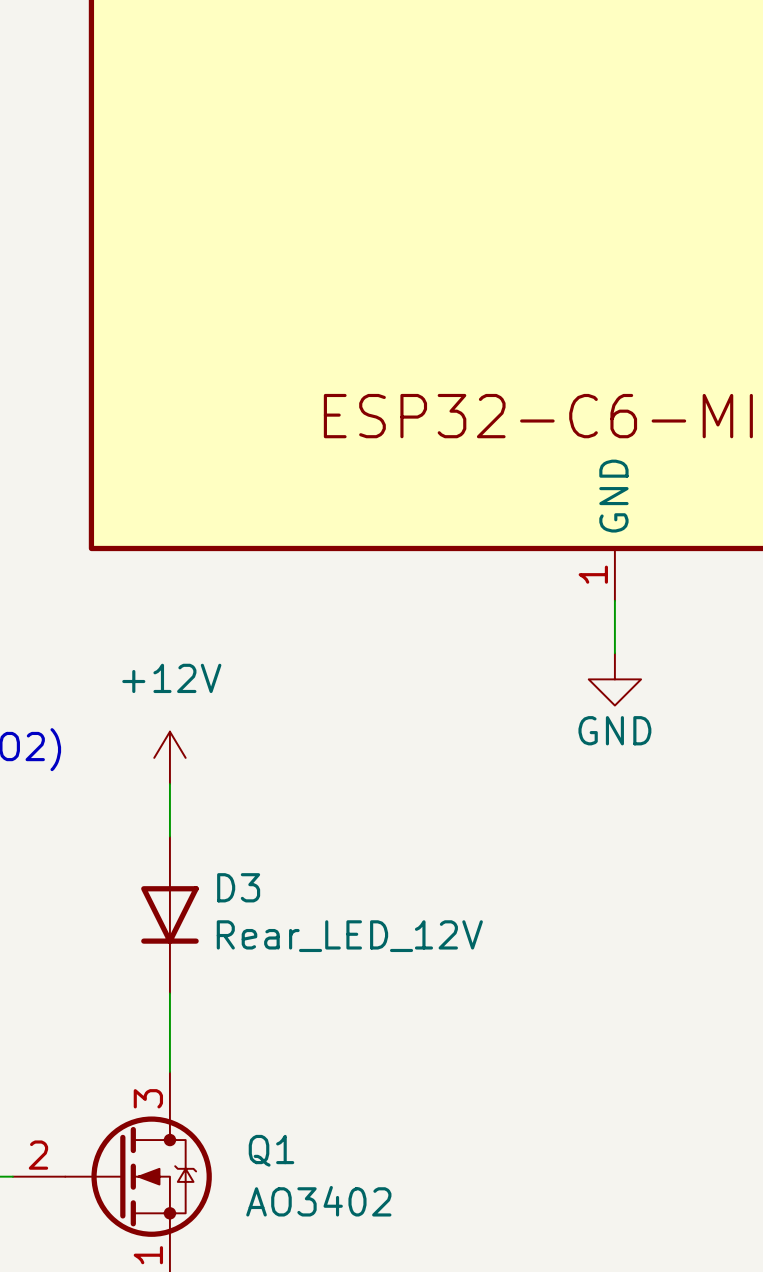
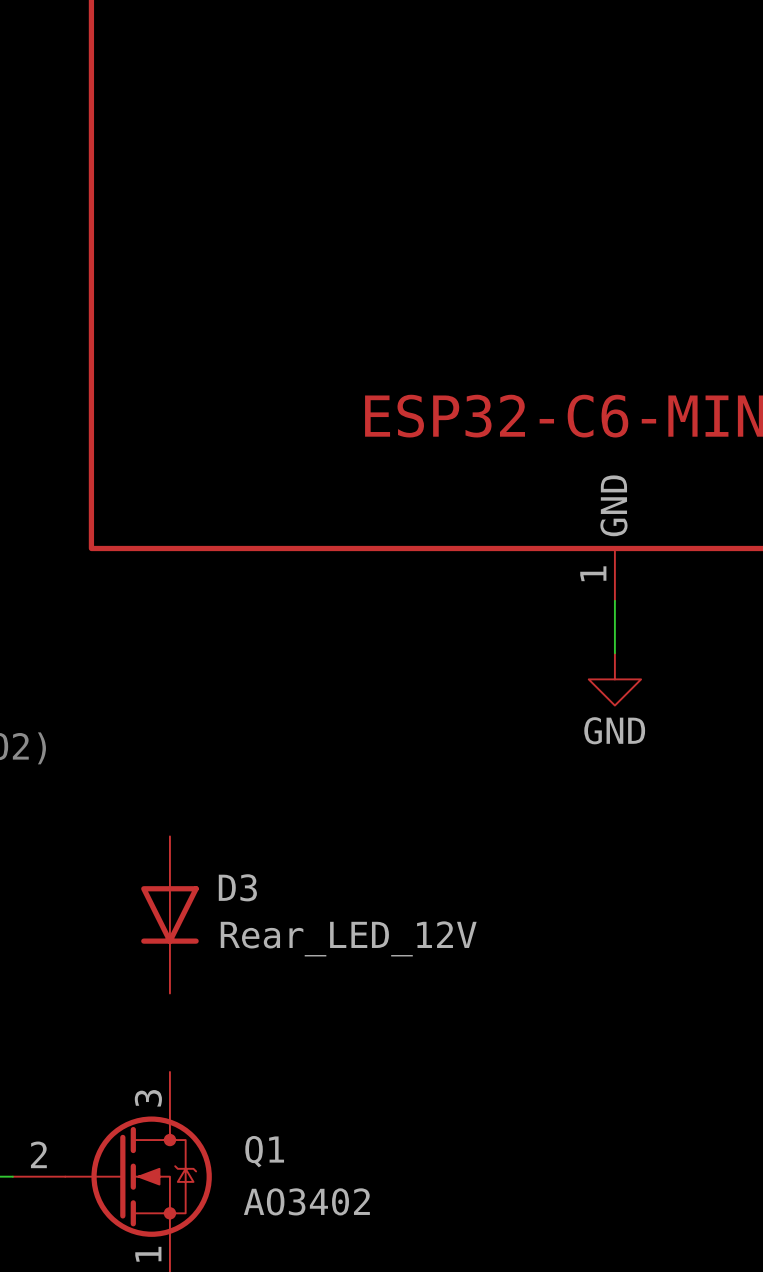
power symbol: +12V (169, 757) -> none
wire: (169, 784) (169, 836) -> none
wire: (169, 993) (169, 1071) -> none

